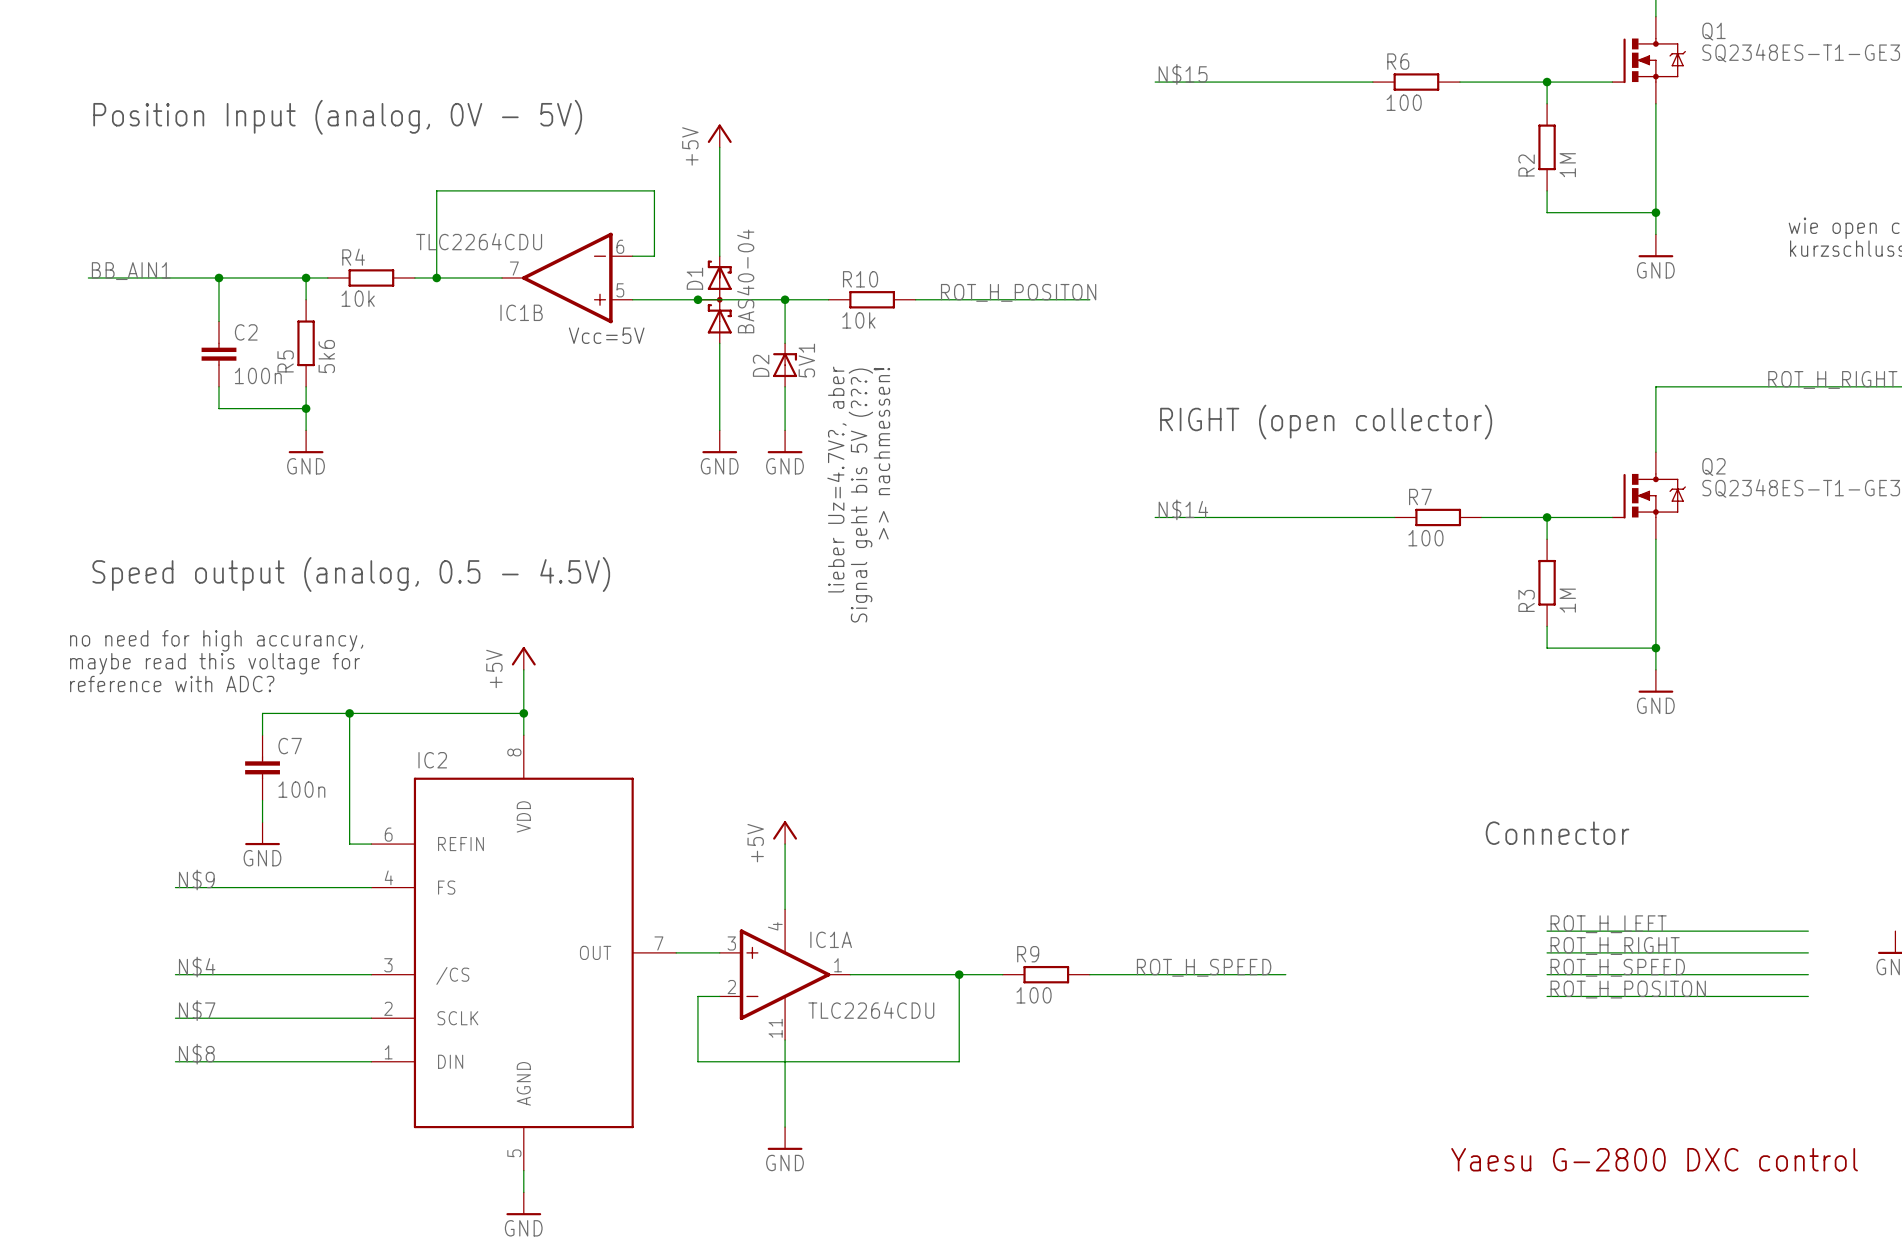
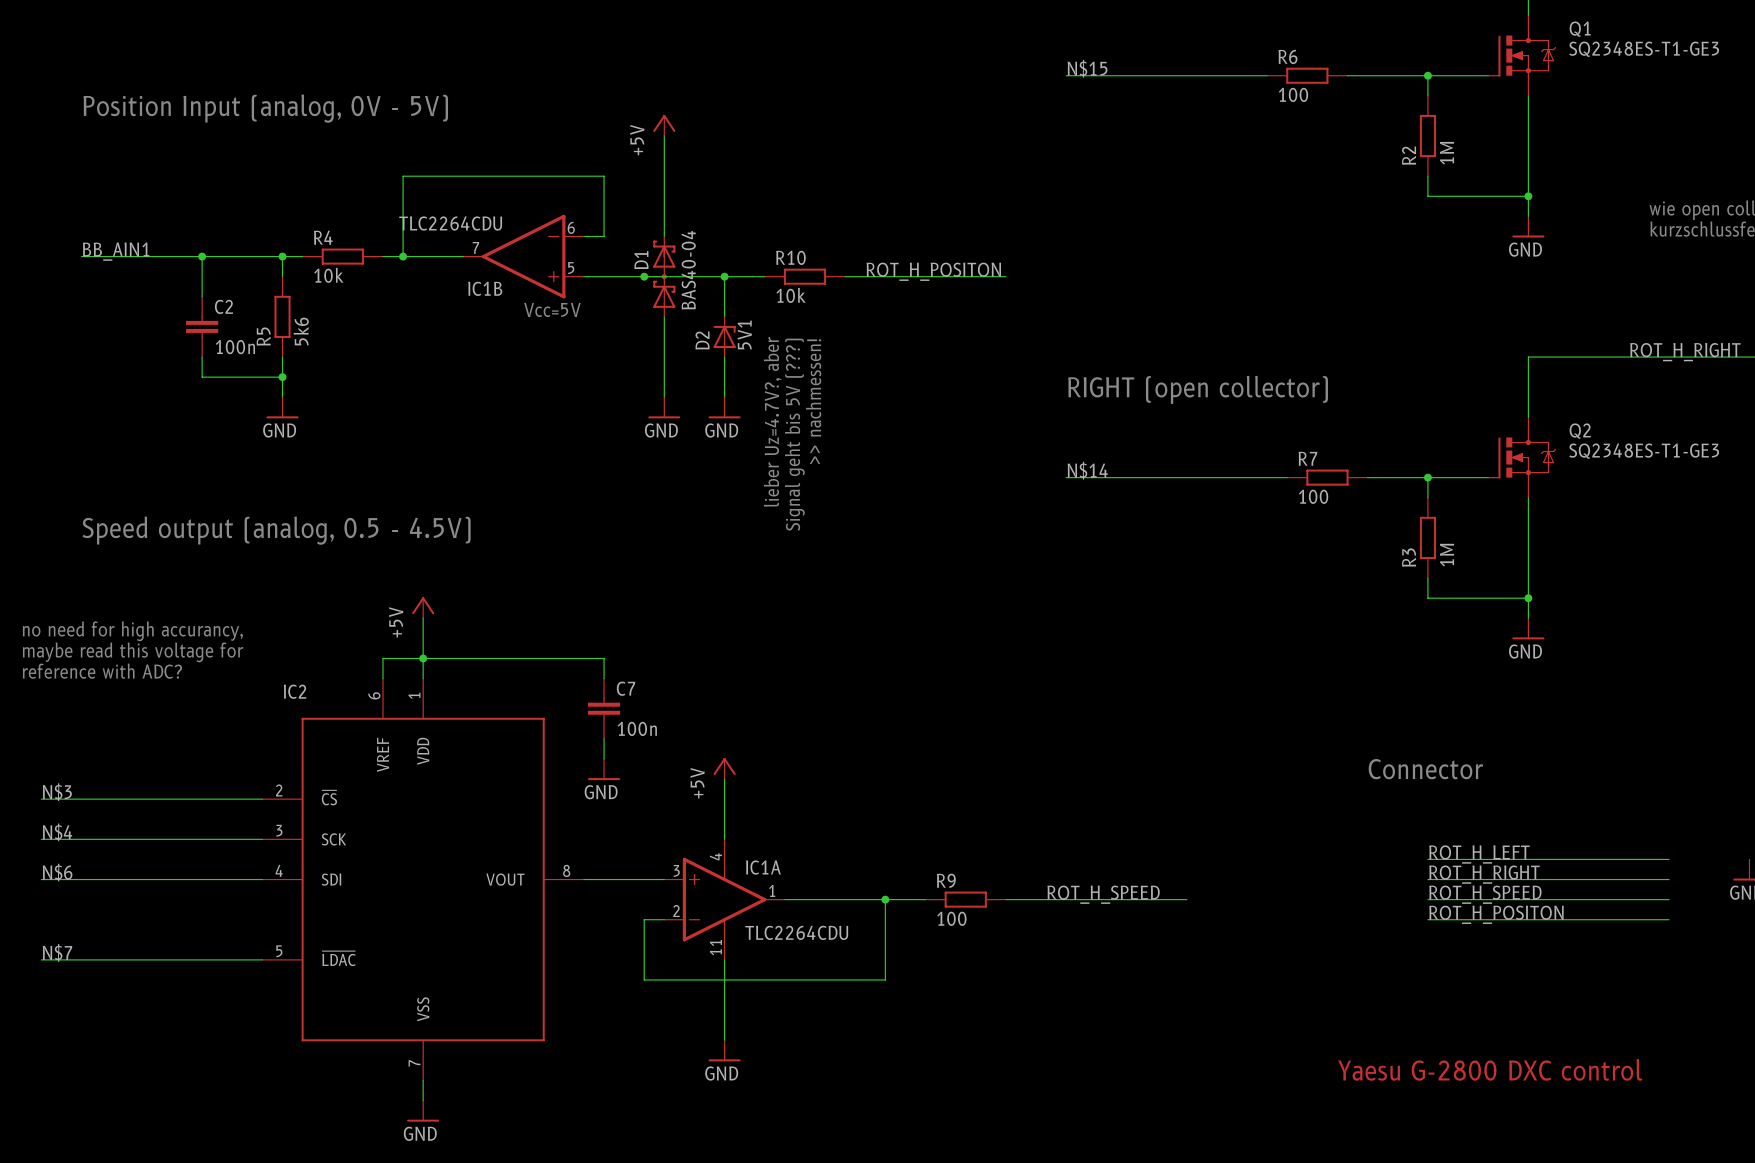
text position: no need for high accurancy, (216, 640) -> no need for high accurancy, (132, 631)
power symbol position: +5V (523, 658) -> +5V (423, 607)
text position: maybe read this voltage for (215, 663) -> maybe read this voltage for (133, 652)
wire: (523, 669) (523, 735) -> (423, 618) (423, 678)
text position: reference with ADC? (172, 684) -> reference with ADC? (102, 671)
wire: (349, 713) (349, 844) (371, 844) -> none
junction: (349, 713) -> none
wire: (414, 713) (262, 713) (262, 735) -> (382, 658) (382, 678)
junction: none -> (423, 658)
wire: none -> (483, 658) (604, 658) (604, 678)
junction: (523, 713) -> none
IC2 symbol: [371, 735, 677, 1171] -> [262, 678, 584, 1081]
IC2 name position: IC2 (432, 760) -> IC2 (295, 691)
C7 position: (262, 767) -> (604, 708)
wire: (262, 800) (262, 822) -> none
wire: none -> (604, 738) (604, 758)
power symbol: GND (262, 833) -> none
power symbol: none -> GND (604, 769)
label: none -> N$3 (57, 792)
wire: none -> (41, 799) (262, 799)
label: N$9 (196, 879) -> none
wire: (175, 887) (371, 887) -> none
wire: none -> (41, 839) (262, 839)
label: none -> N$6 (57, 872)
wire: none -> (41, 879) (262, 879)
label position: N$4 (197, 967) -> N$4 (57, 832)
wire: (175, 974) (371, 974) -> none
label position: N$7 (197, 1010) -> N$7 (57, 952)
wire: (175, 1018) (371, 1018) -> none
wire: none -> (41, 959) (262, 959)
label: N$8 (196, 1054) -> none
wire: (175, 1061) (371, 1061) -> none
wire: (523, 1170) (523, 1192) -> (423, 1080) (423, 1100)
power symbol position: GND (523, 1203) -> GND (423, 1111)

